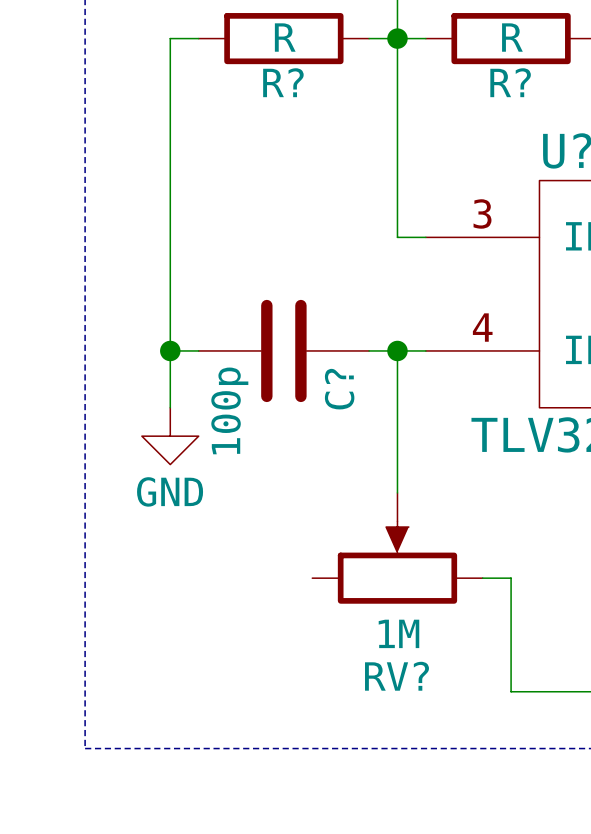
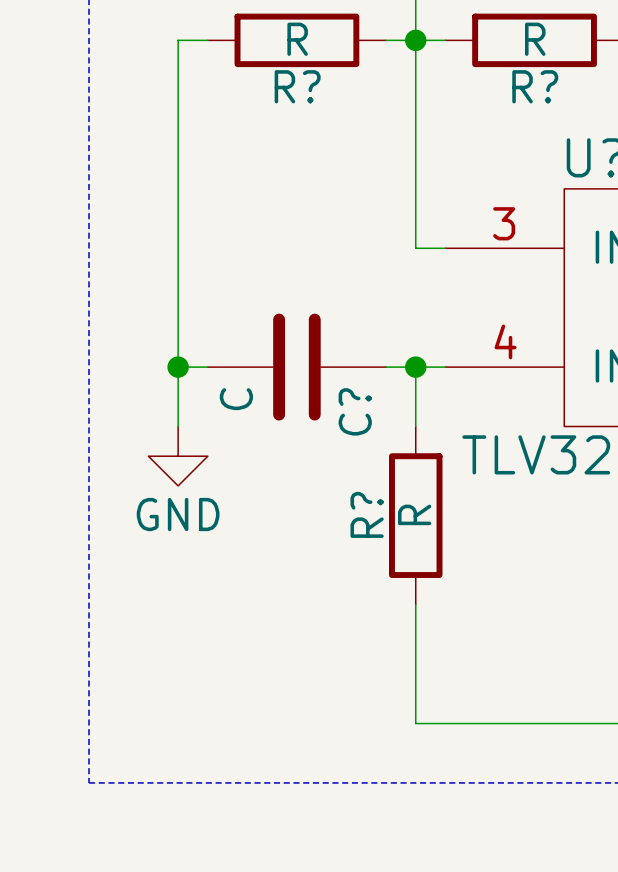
wire: (397, 407) (397, 492) -> none
C? value: 100p (229, 410) -> C (236, 399)
R?: none -> R (415, 515)
RV?: 1M (397, 548) -> none
wire: (482, 578) (511, 578) (511, 691) -> (415, 604) (415, 723) (534, 723)

